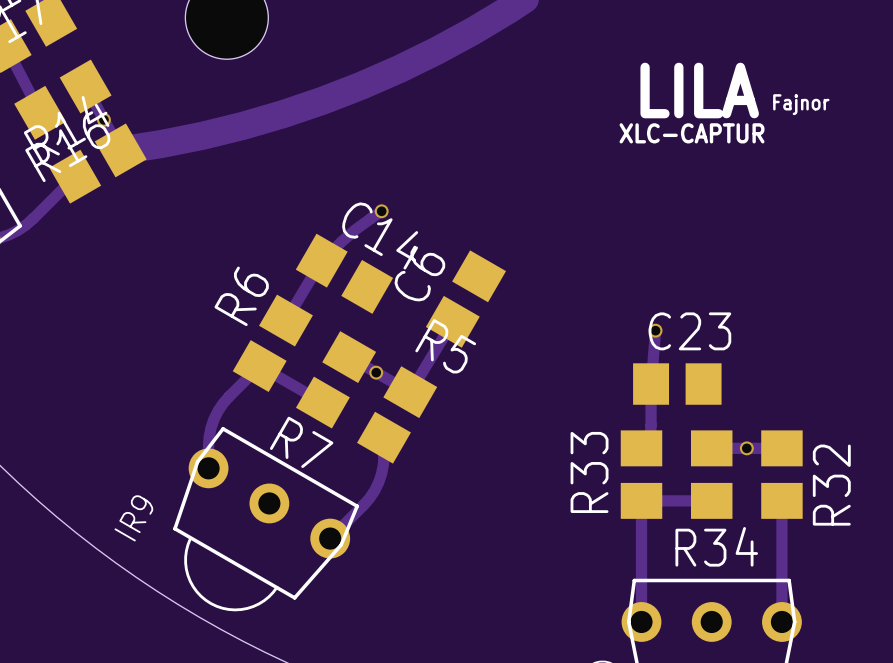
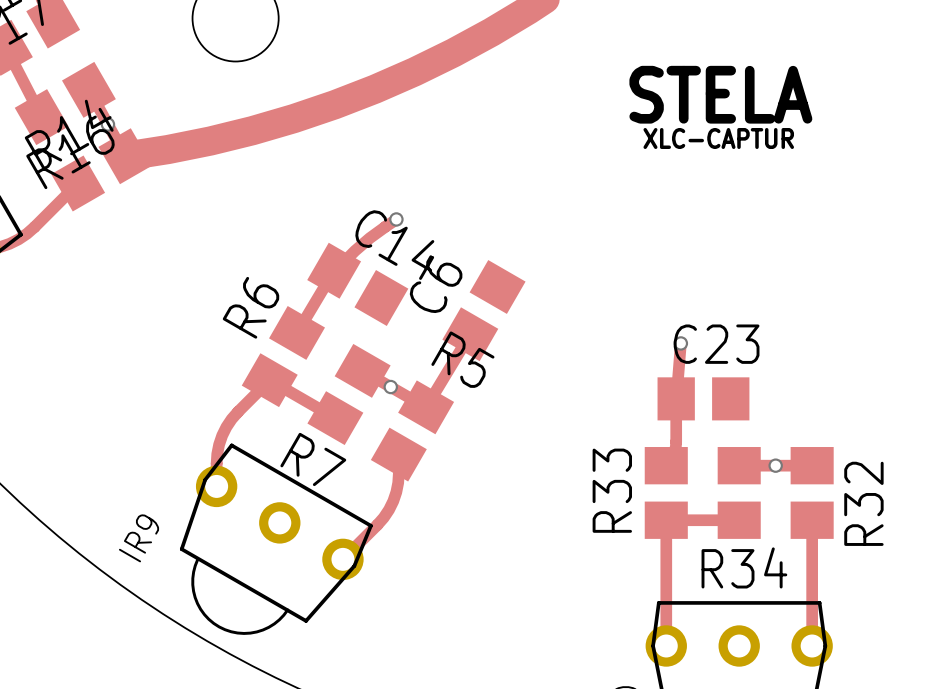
text: LILA (699, 90) -> STELA (720, 94)
text: Fajnor (801, 104) -> none

